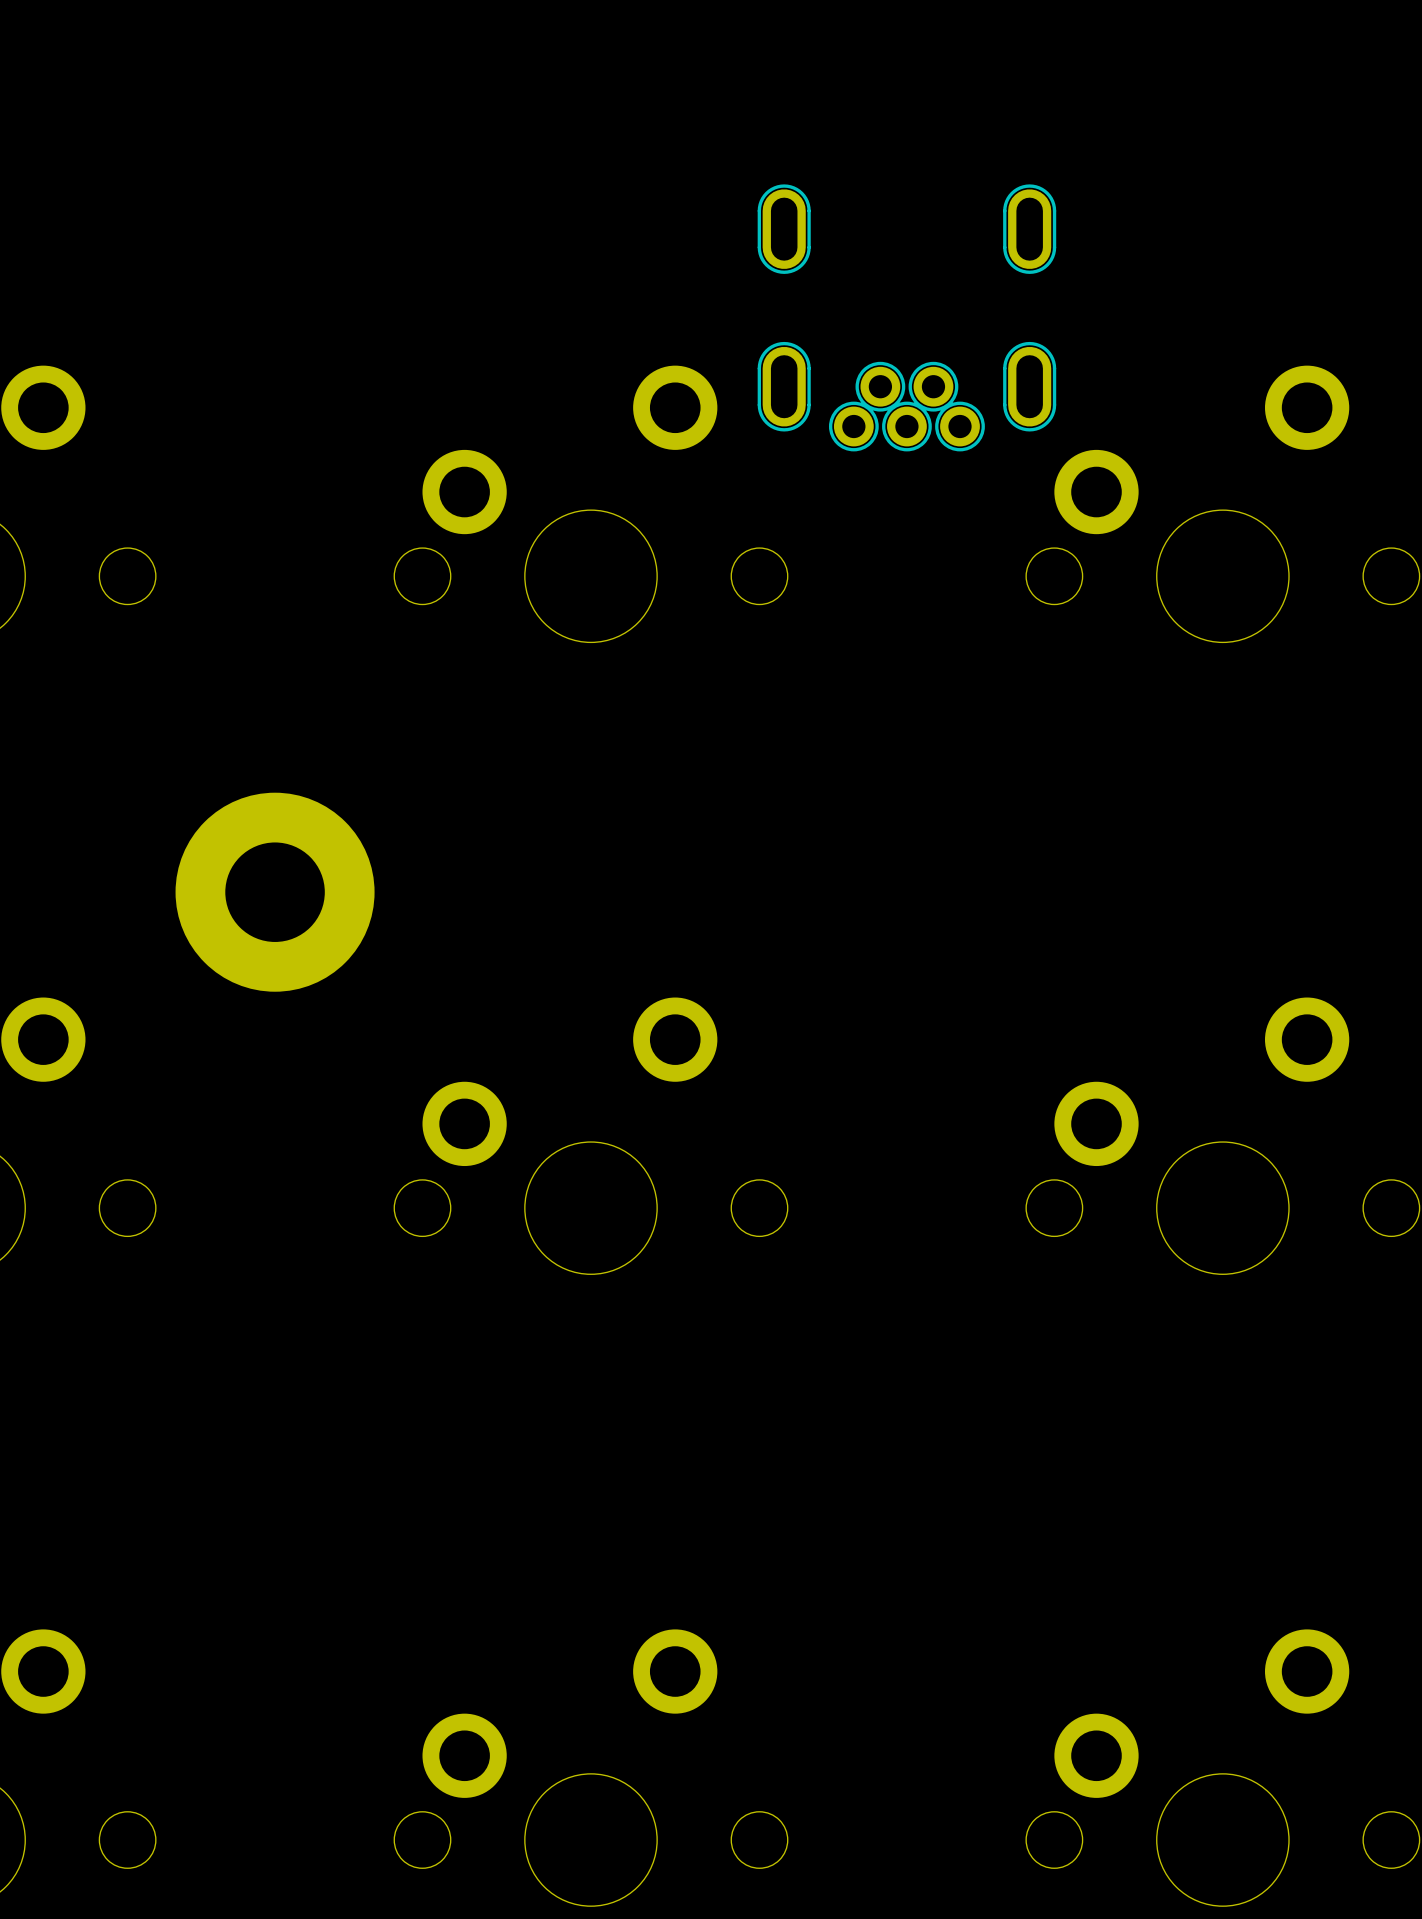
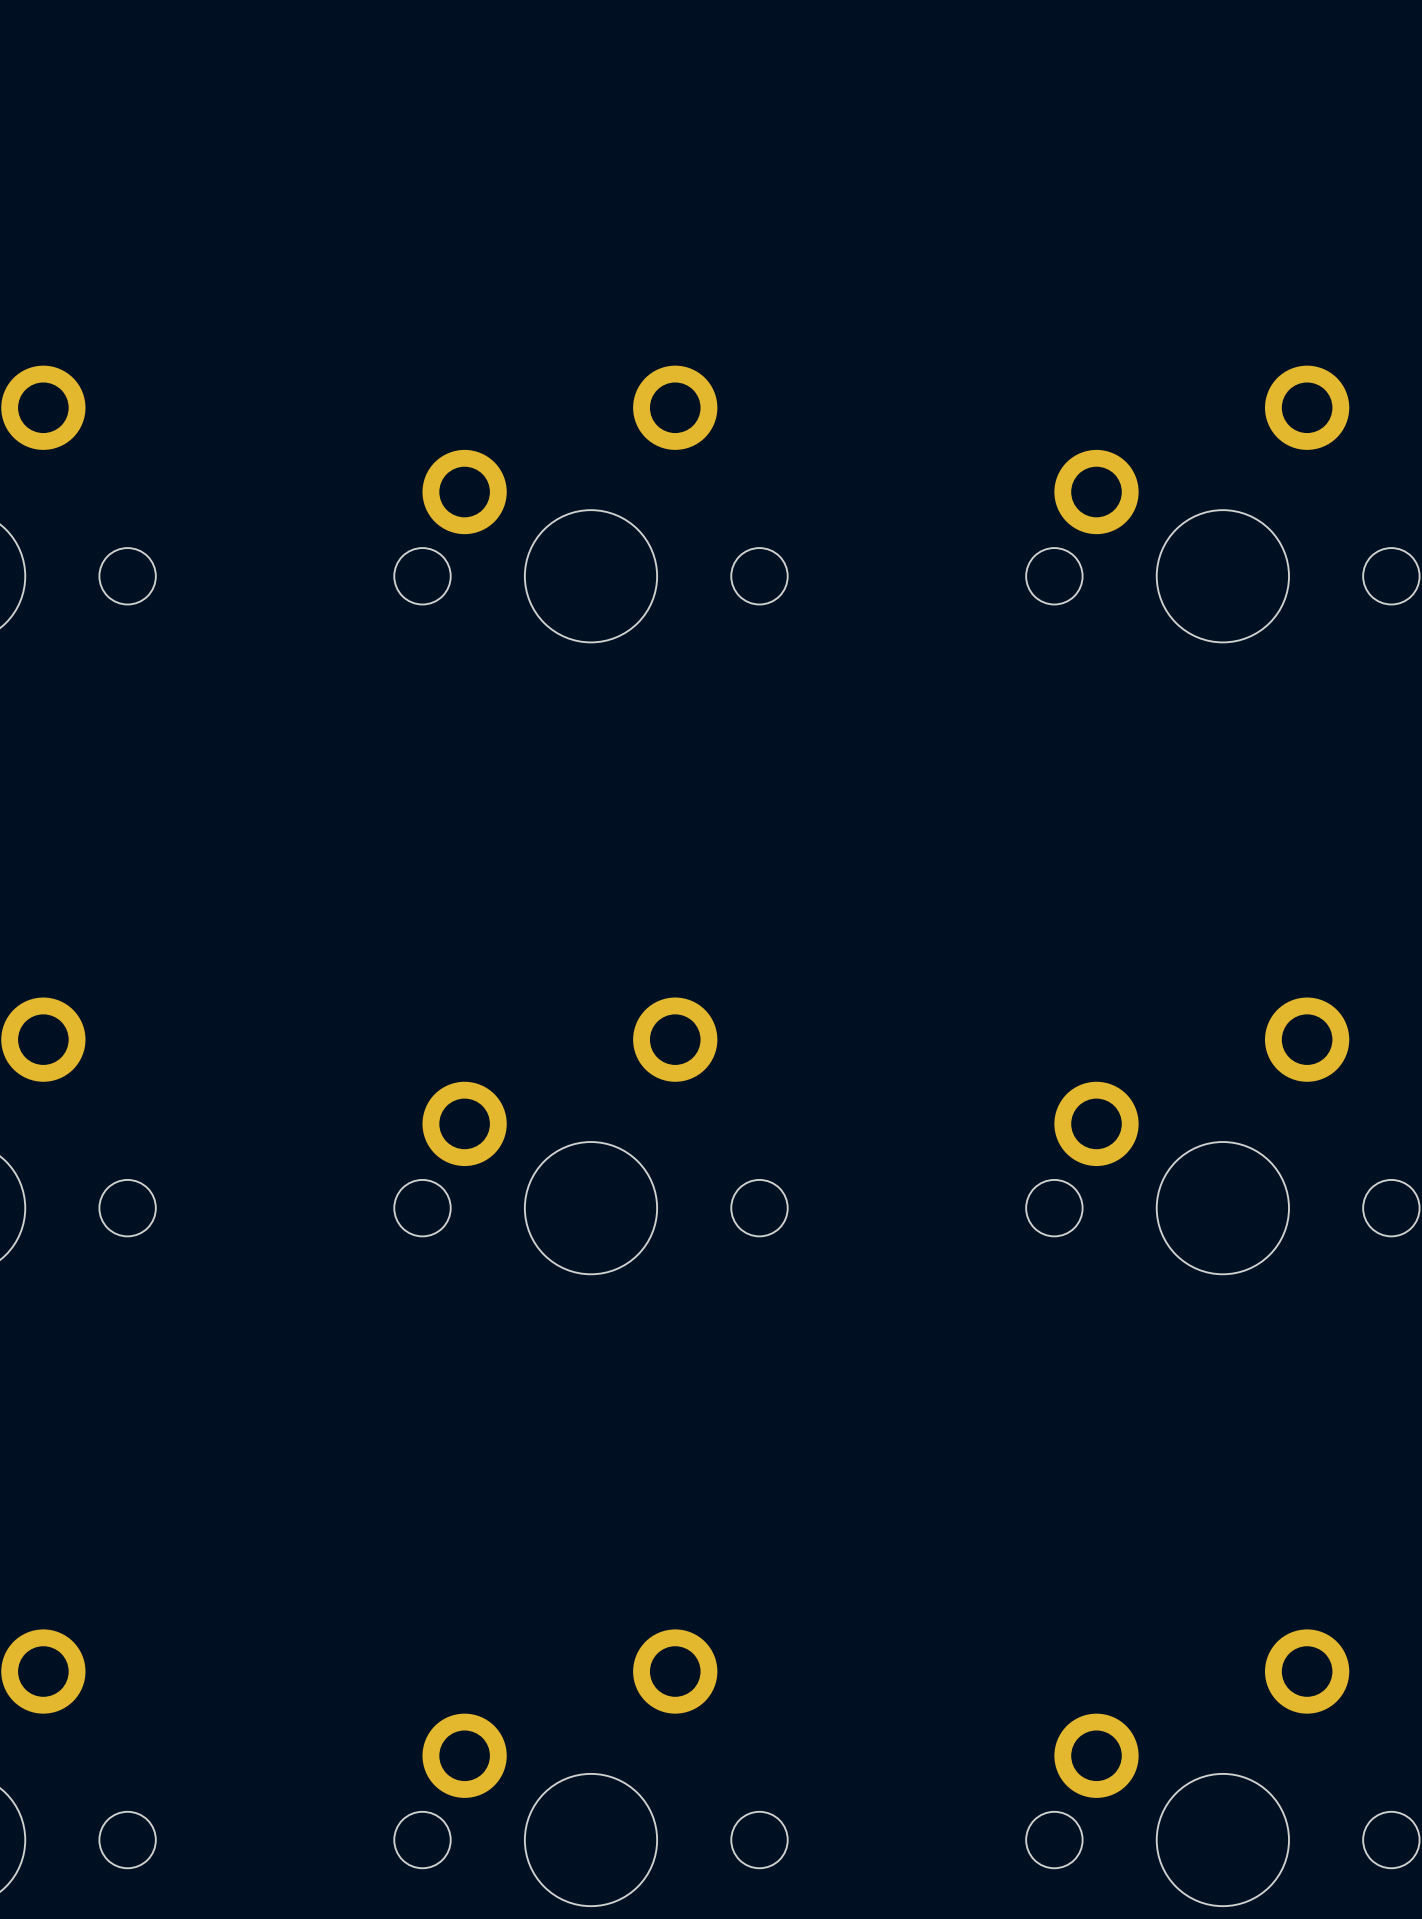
part: (906, 317) -> none
part: (275, 892) -> none

